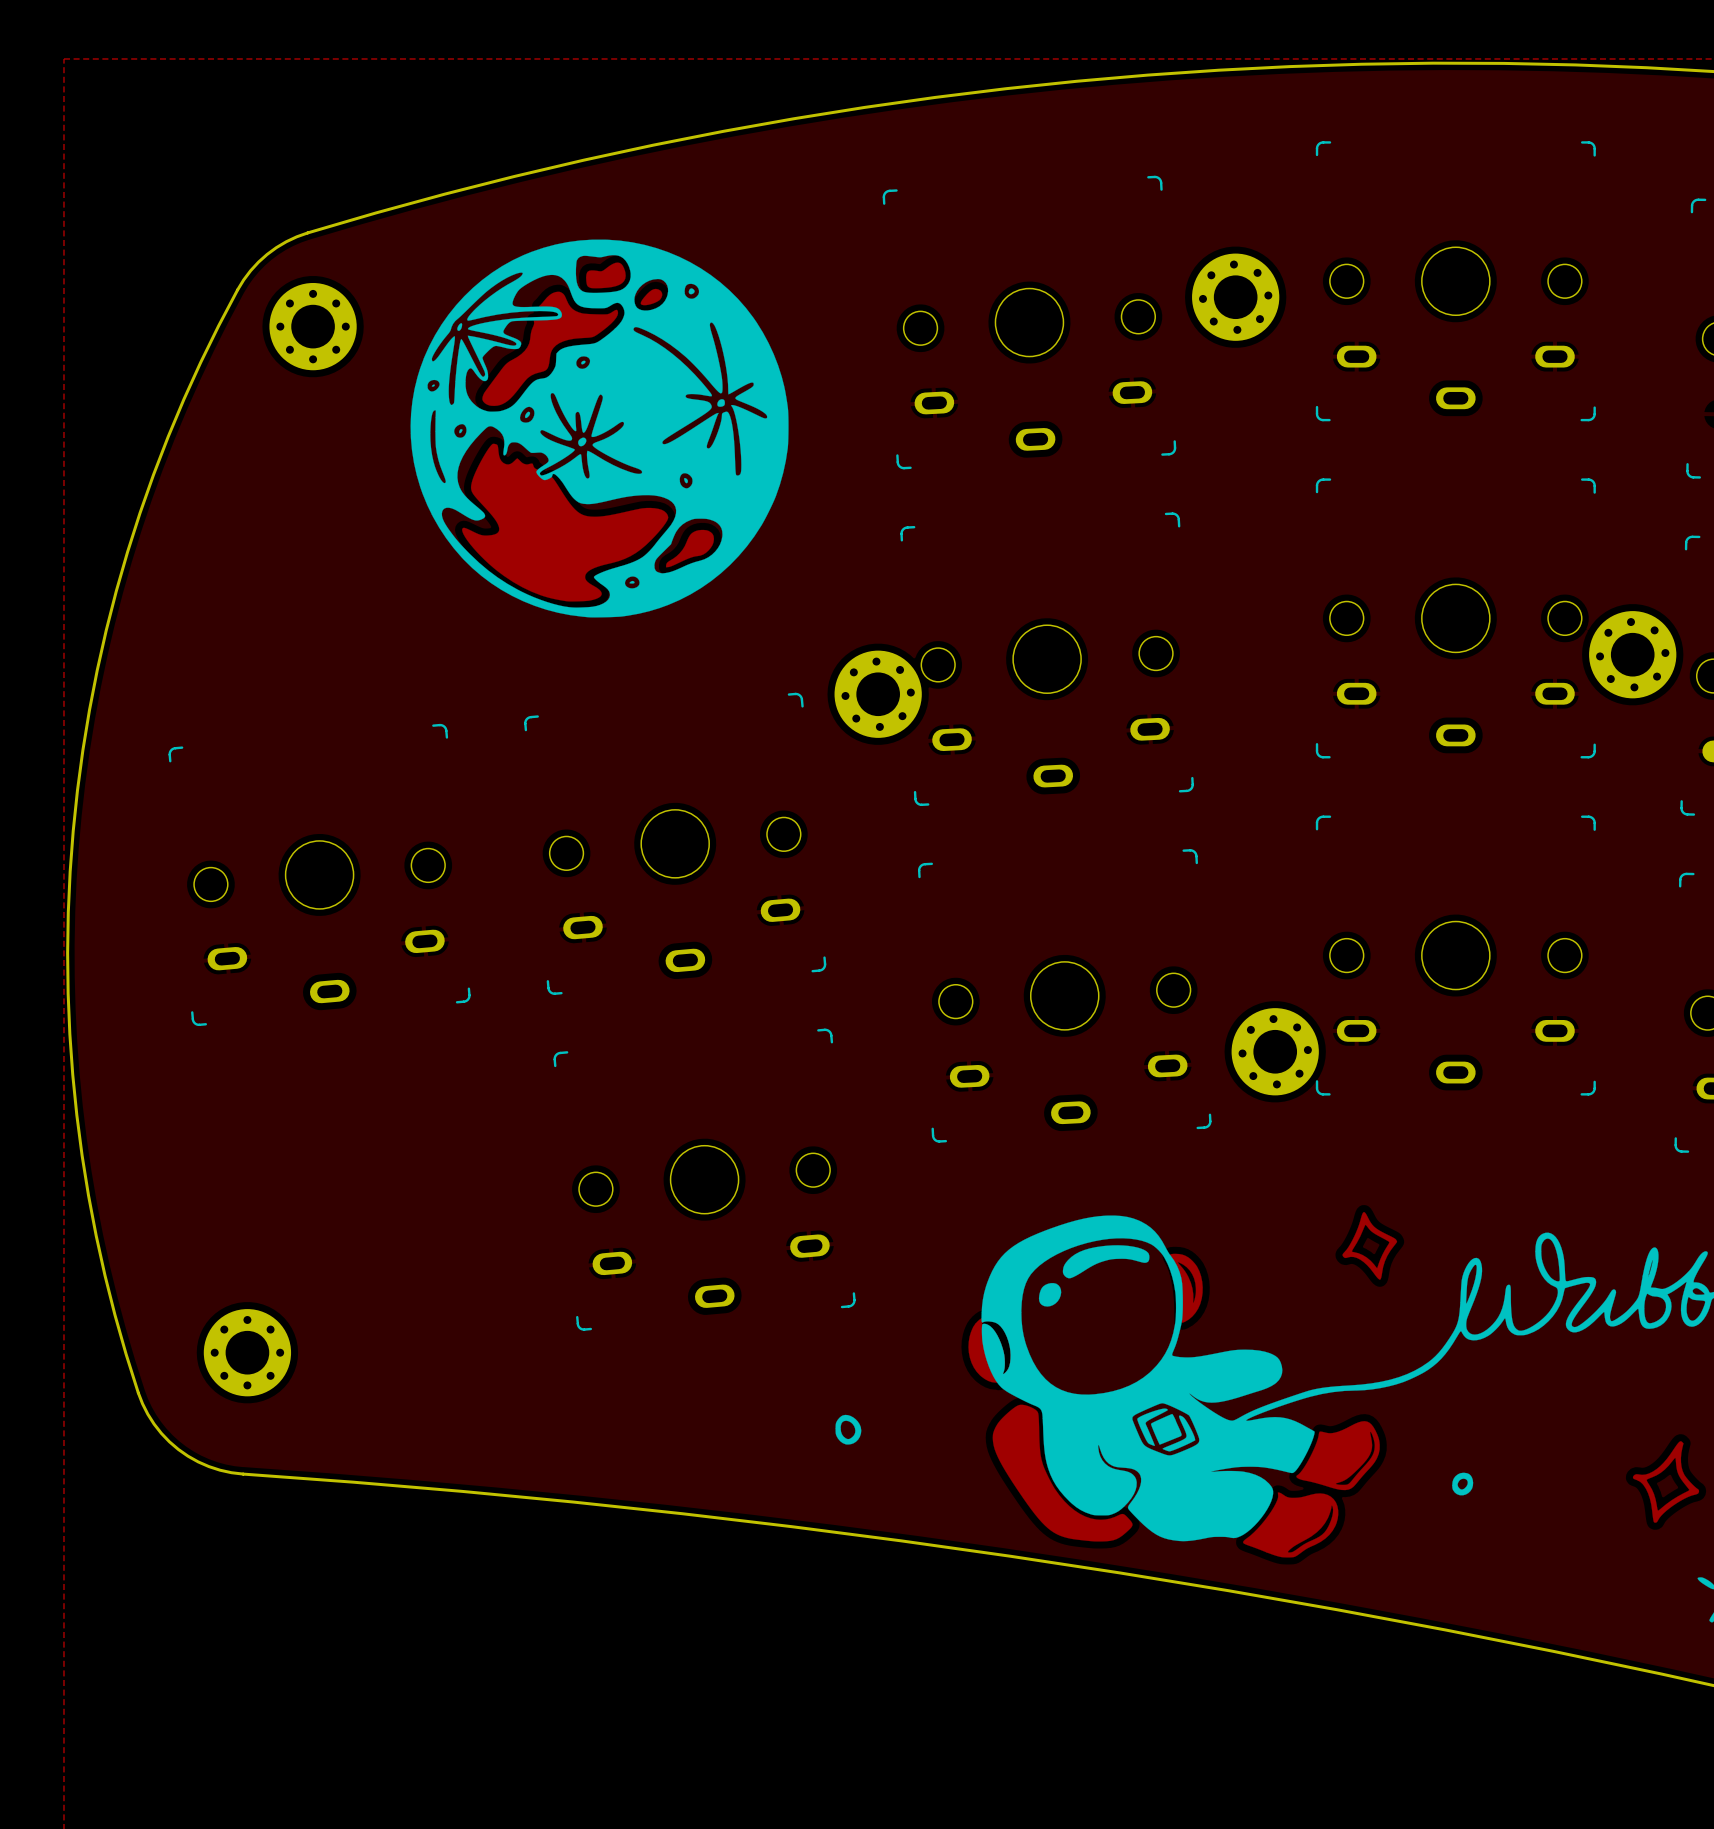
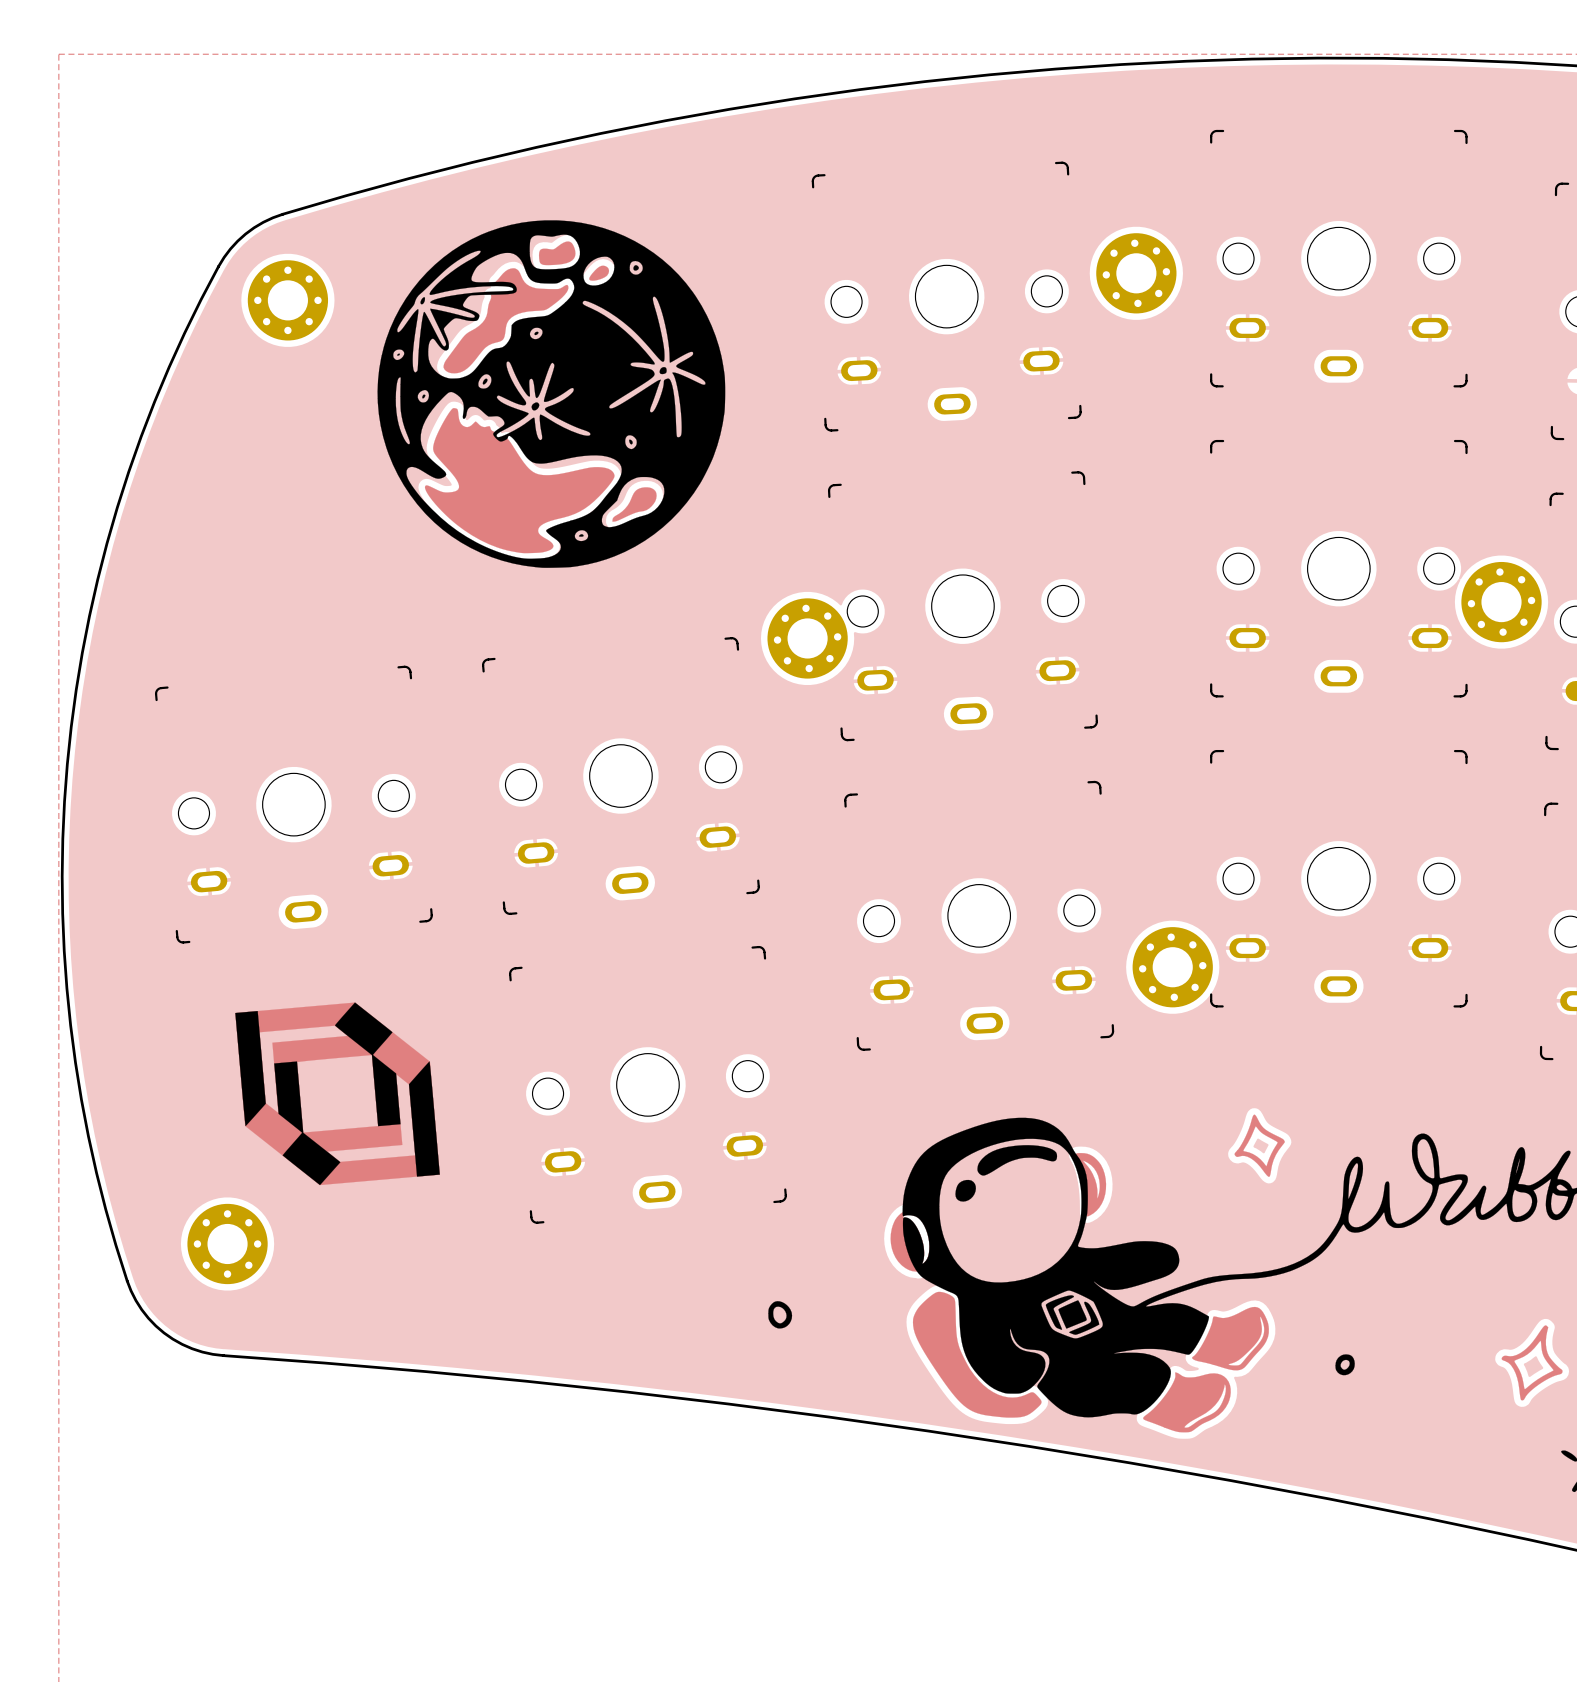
drawing: none -> [235, 1002, 440, 1186]

